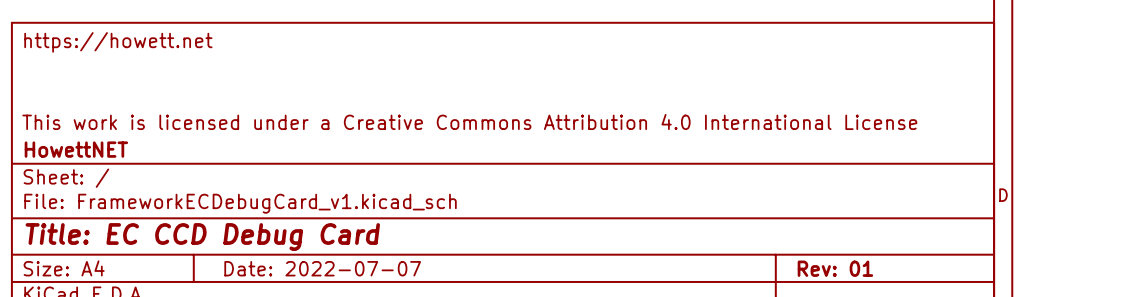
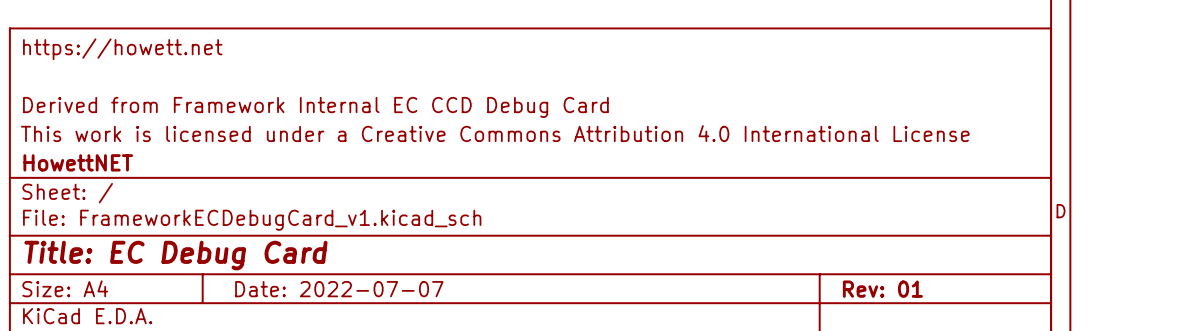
title block: none -> Derived from Framework Internal EC CCD Debug Card (315, 107)
title block: Title: EC CCD Debug Card (202, 237) -> Title: EC Debug Card (175, 255)

